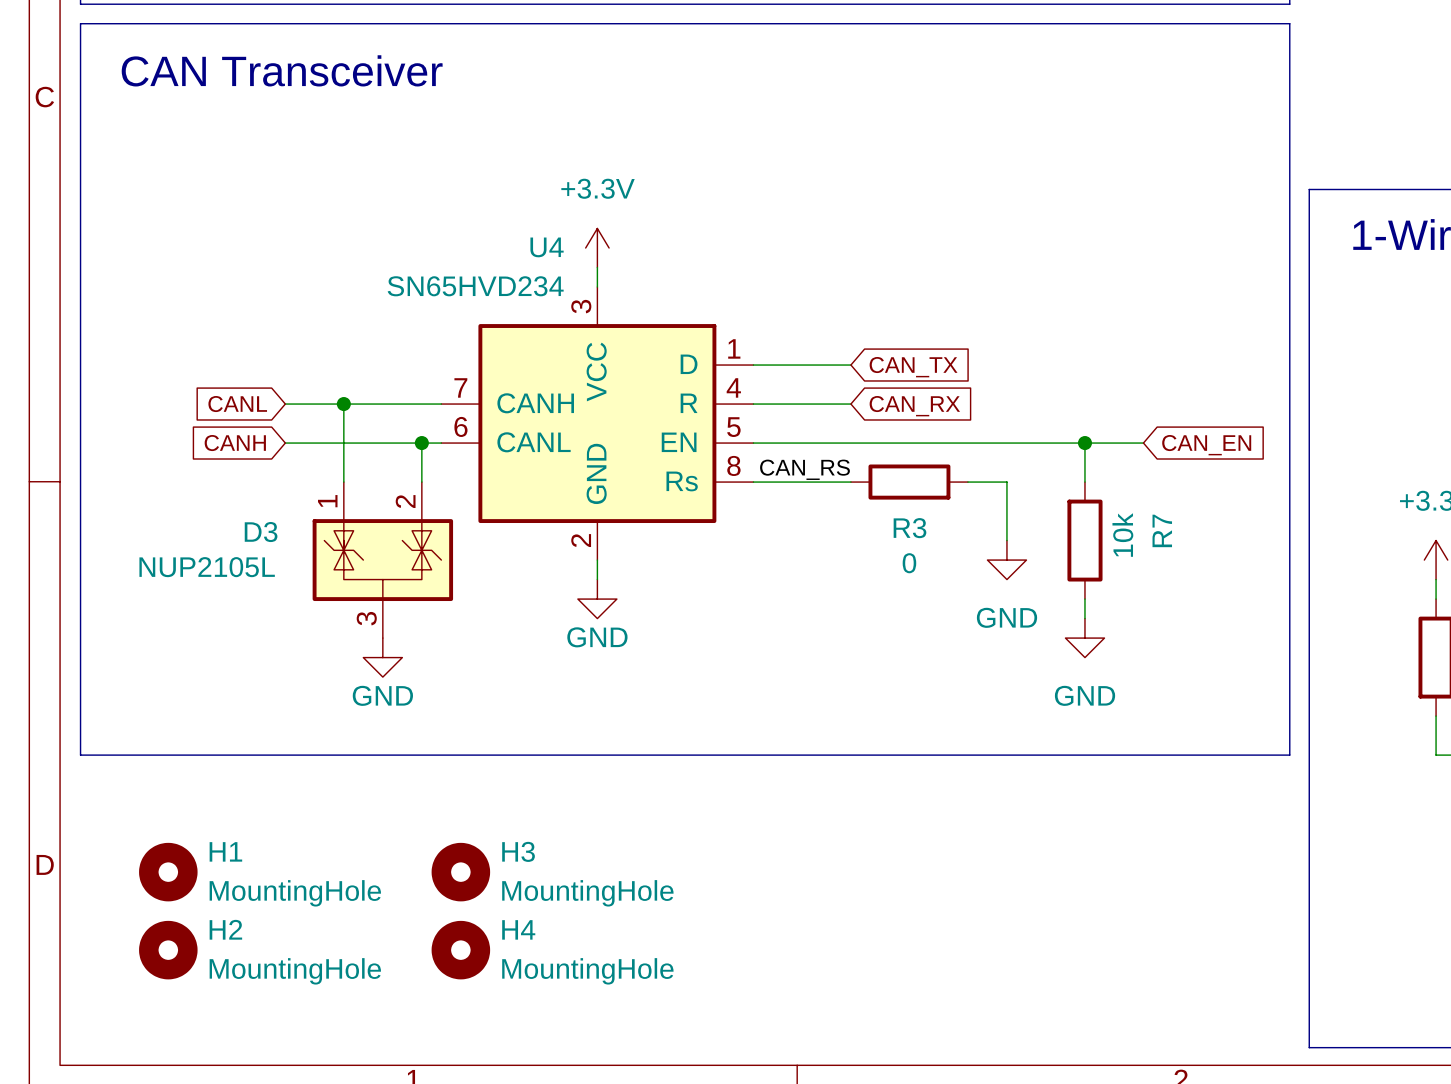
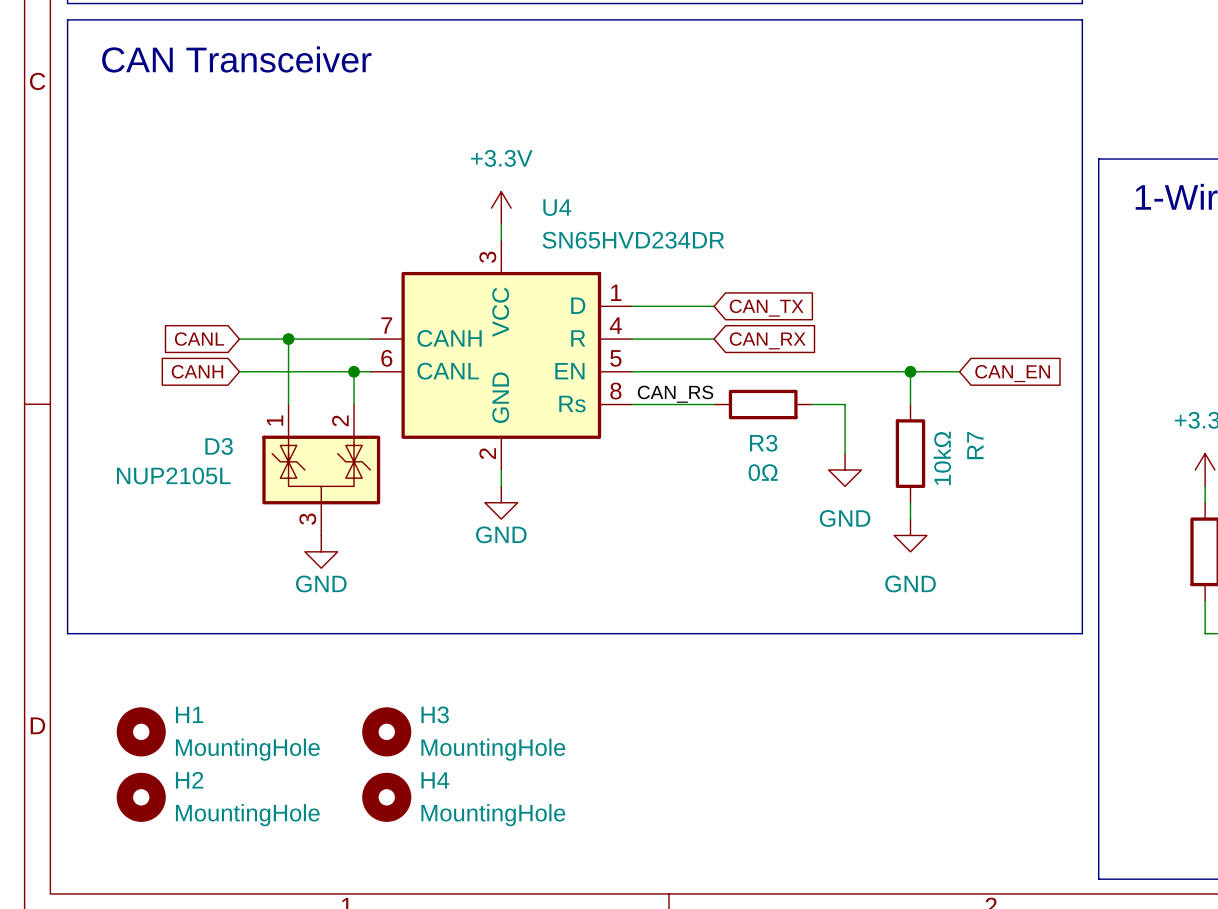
U4 name position: U4 (547, 247) -> U4 (557, 207)
U4 value: SN65HVD234 (475, 286) -> SN65HVD234DR (633, 240)
R7 value: 10k (1122, 535) -> 10kΩ (942, 458)
R3 value: 0 (909, 563) -> 0Ω (763, 472)

